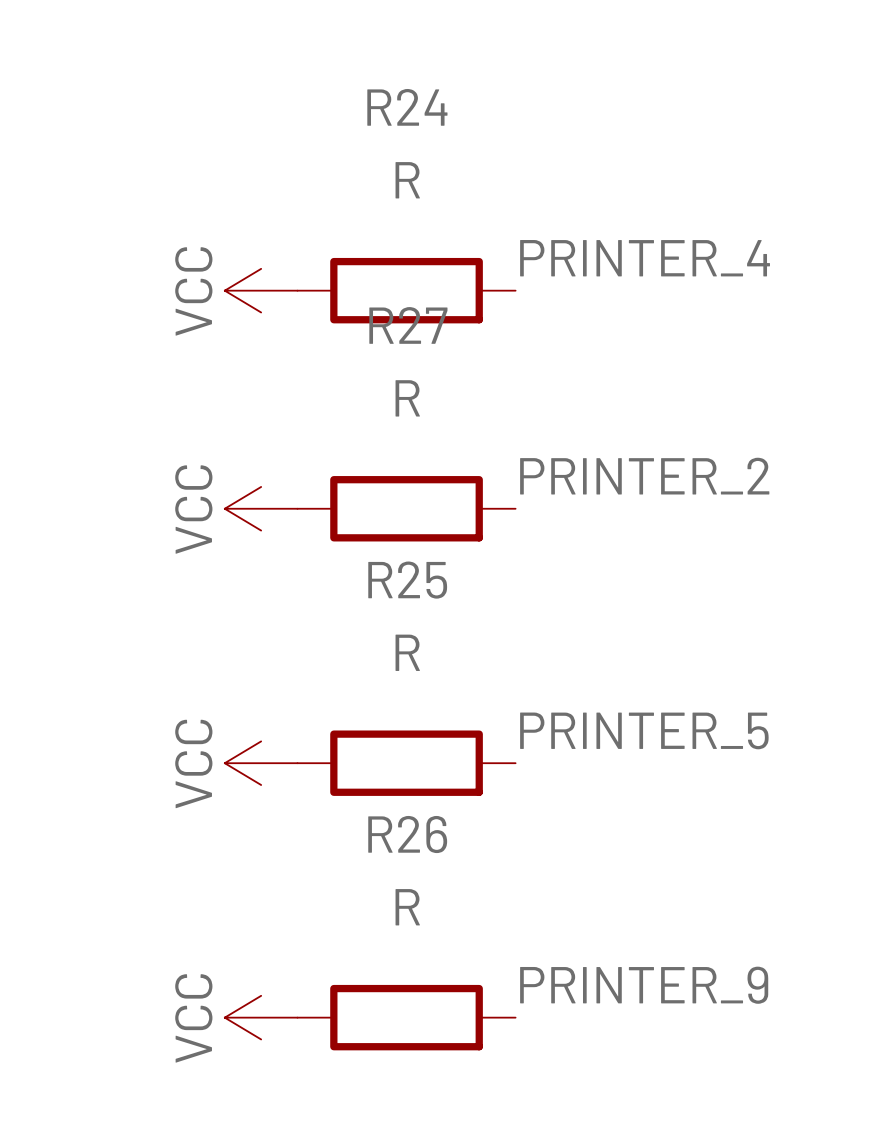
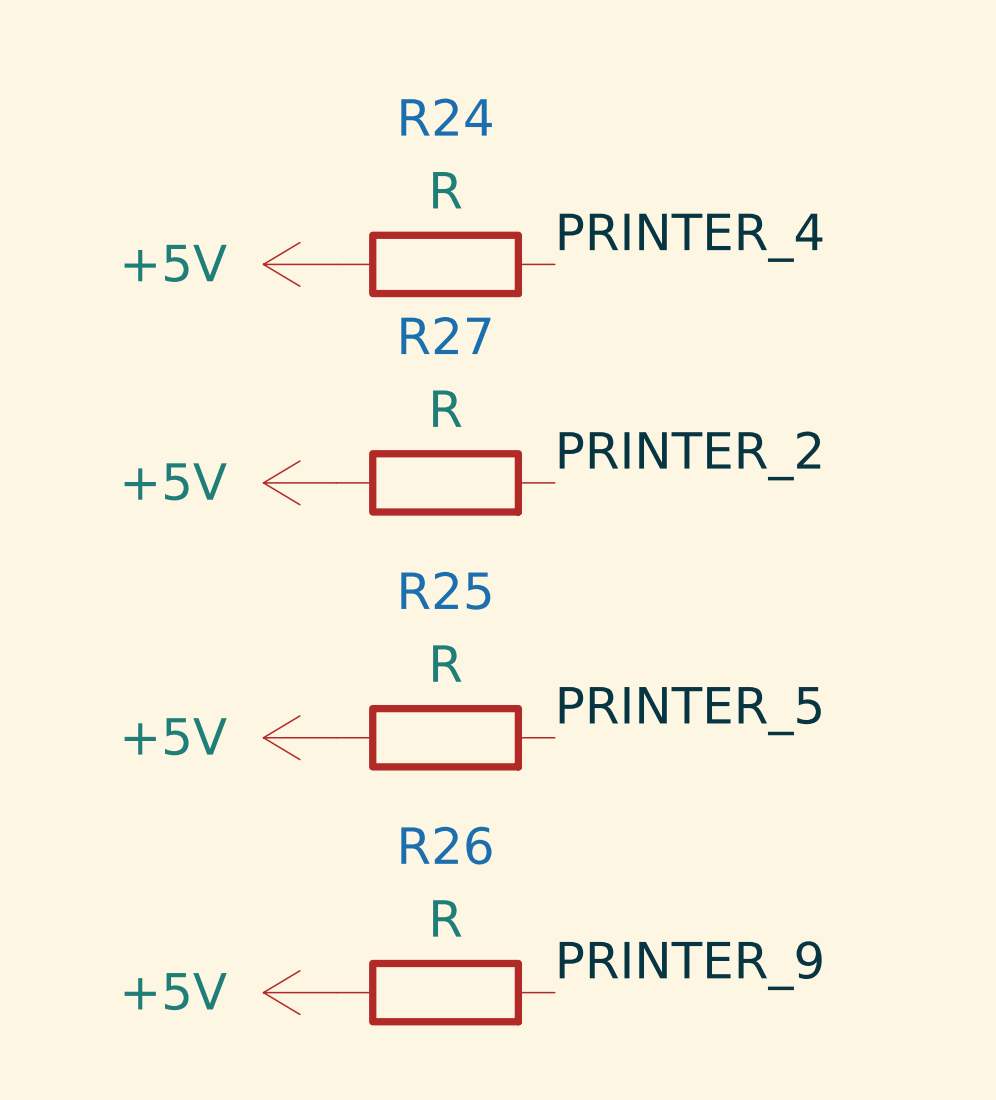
R24 name position: R24 (407, 107) -> R24 (446, 117)
R24 value position: R (407, 180) -> R (447, 190)
power symbol: VCC (261, 290) -> +5V (299, 264)
R27 name position: R27 (408, 325) -> R27 (445, 335)
R27 value position: R (407, 398) -> R (447, 408)
power symbol: VCC (261, 508) -> +5V (299, 482)
R25 name position: R25 (407, 580) -> R25 (445, 590)
R25 value position: R (407, 652) -> R (447, 663)
power symbol: VCC (261, 763) -> +5V (299, 737)
R26 name position: R26 (407, 834) -> R26 (446, 845)
R26 value position: R (407, 907) -> R (447, 918)
power symbol: VCC (261, 1017) -> +5V (299, 992)

